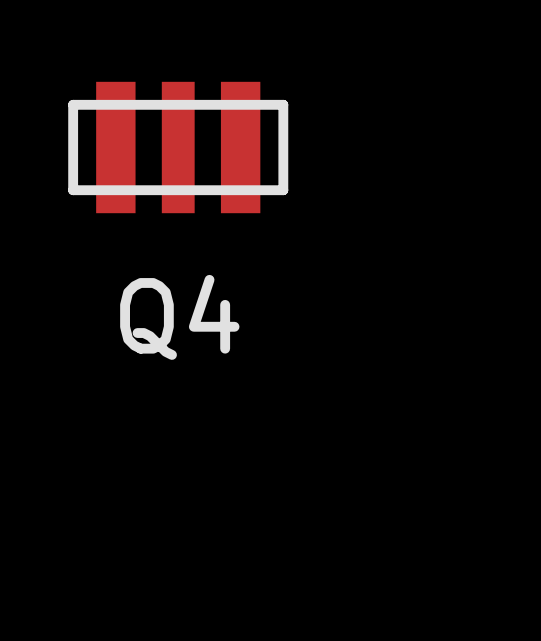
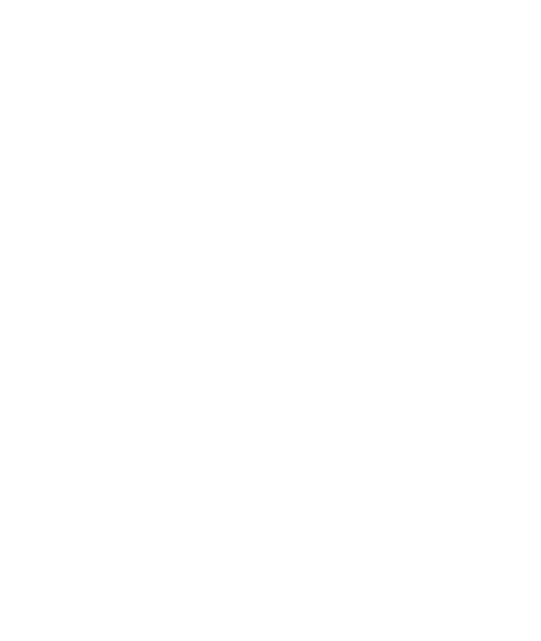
Q4: (178, 147) -> none

